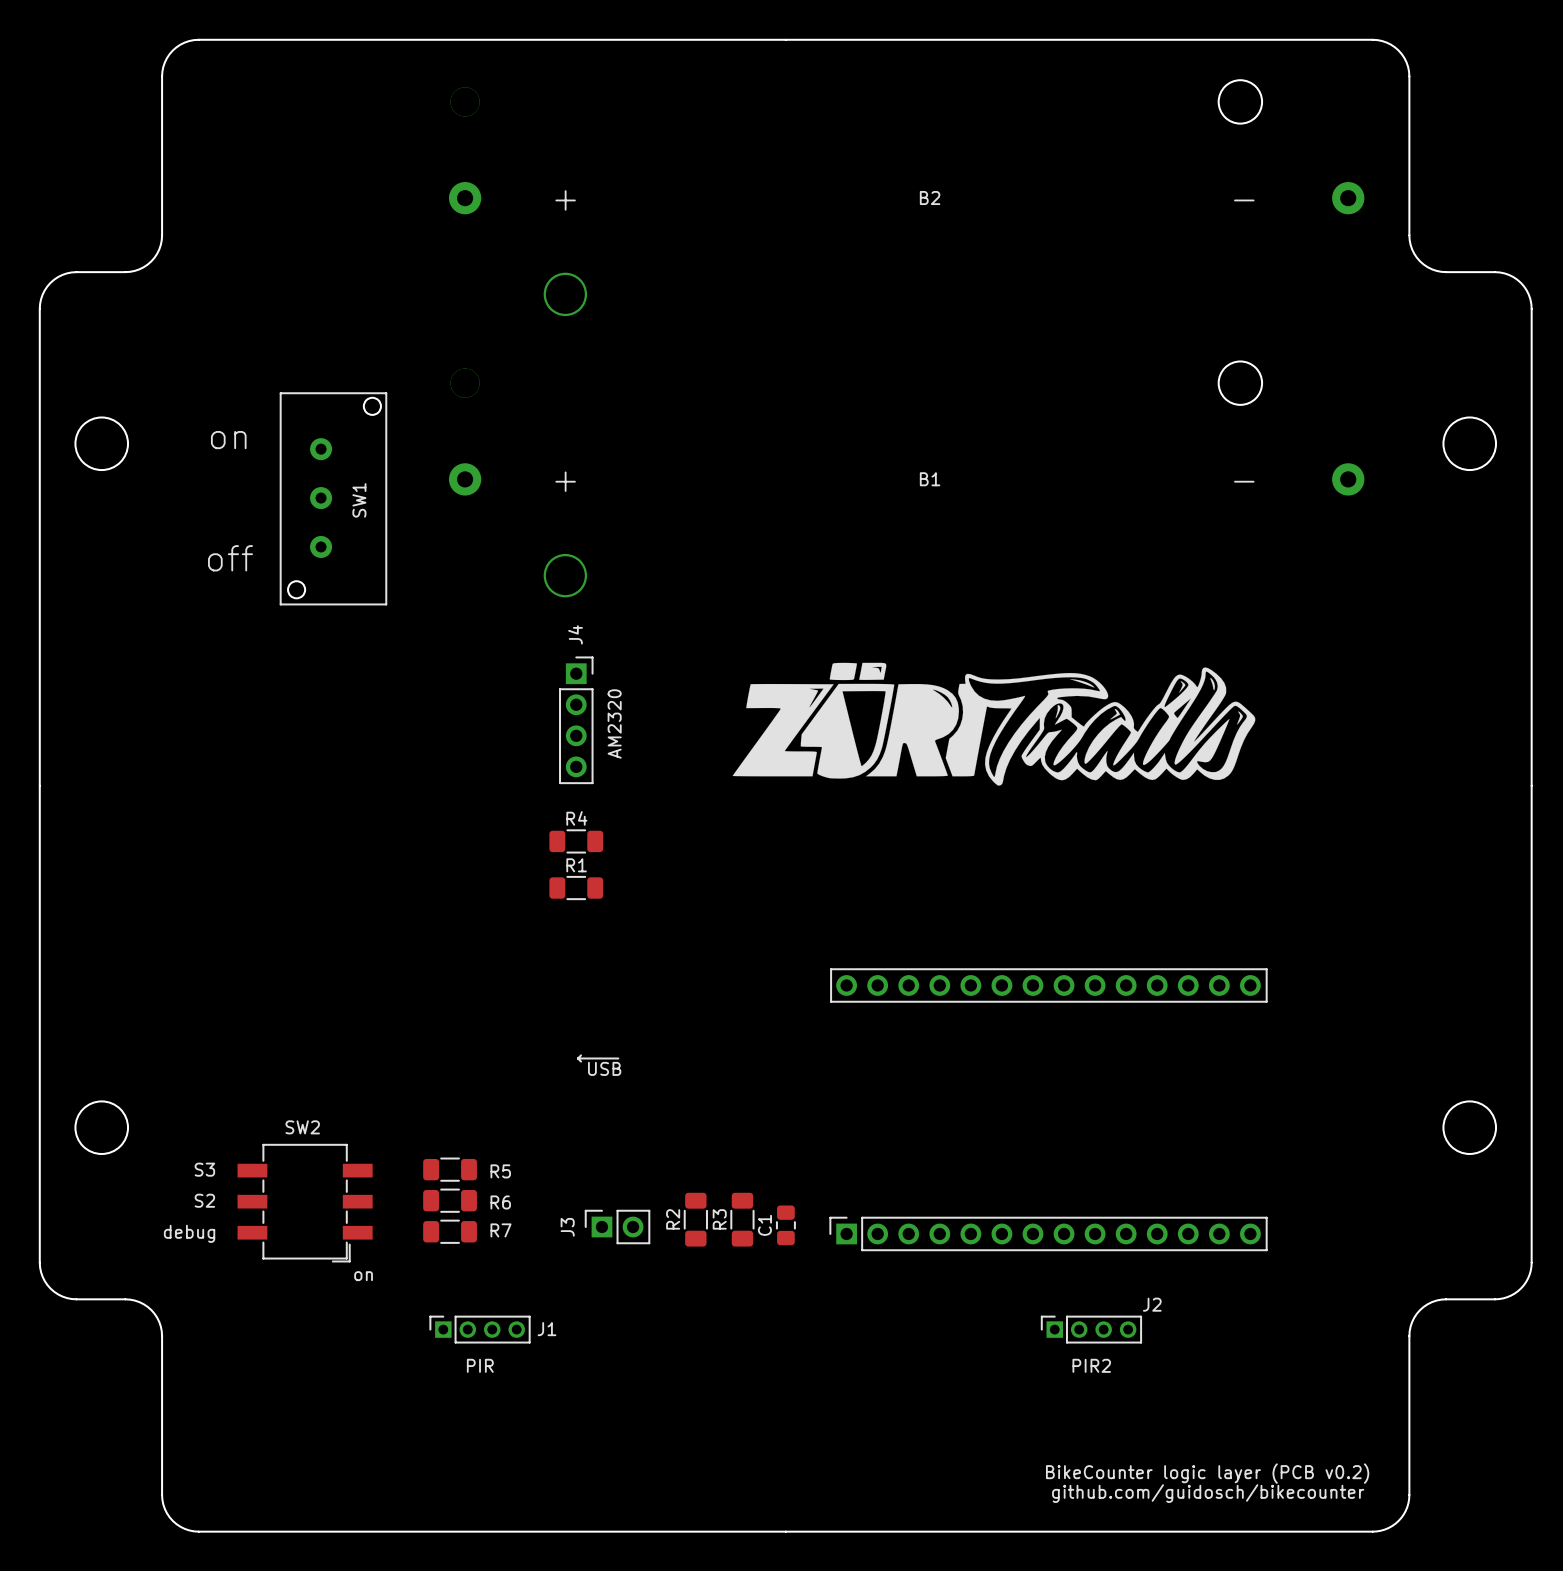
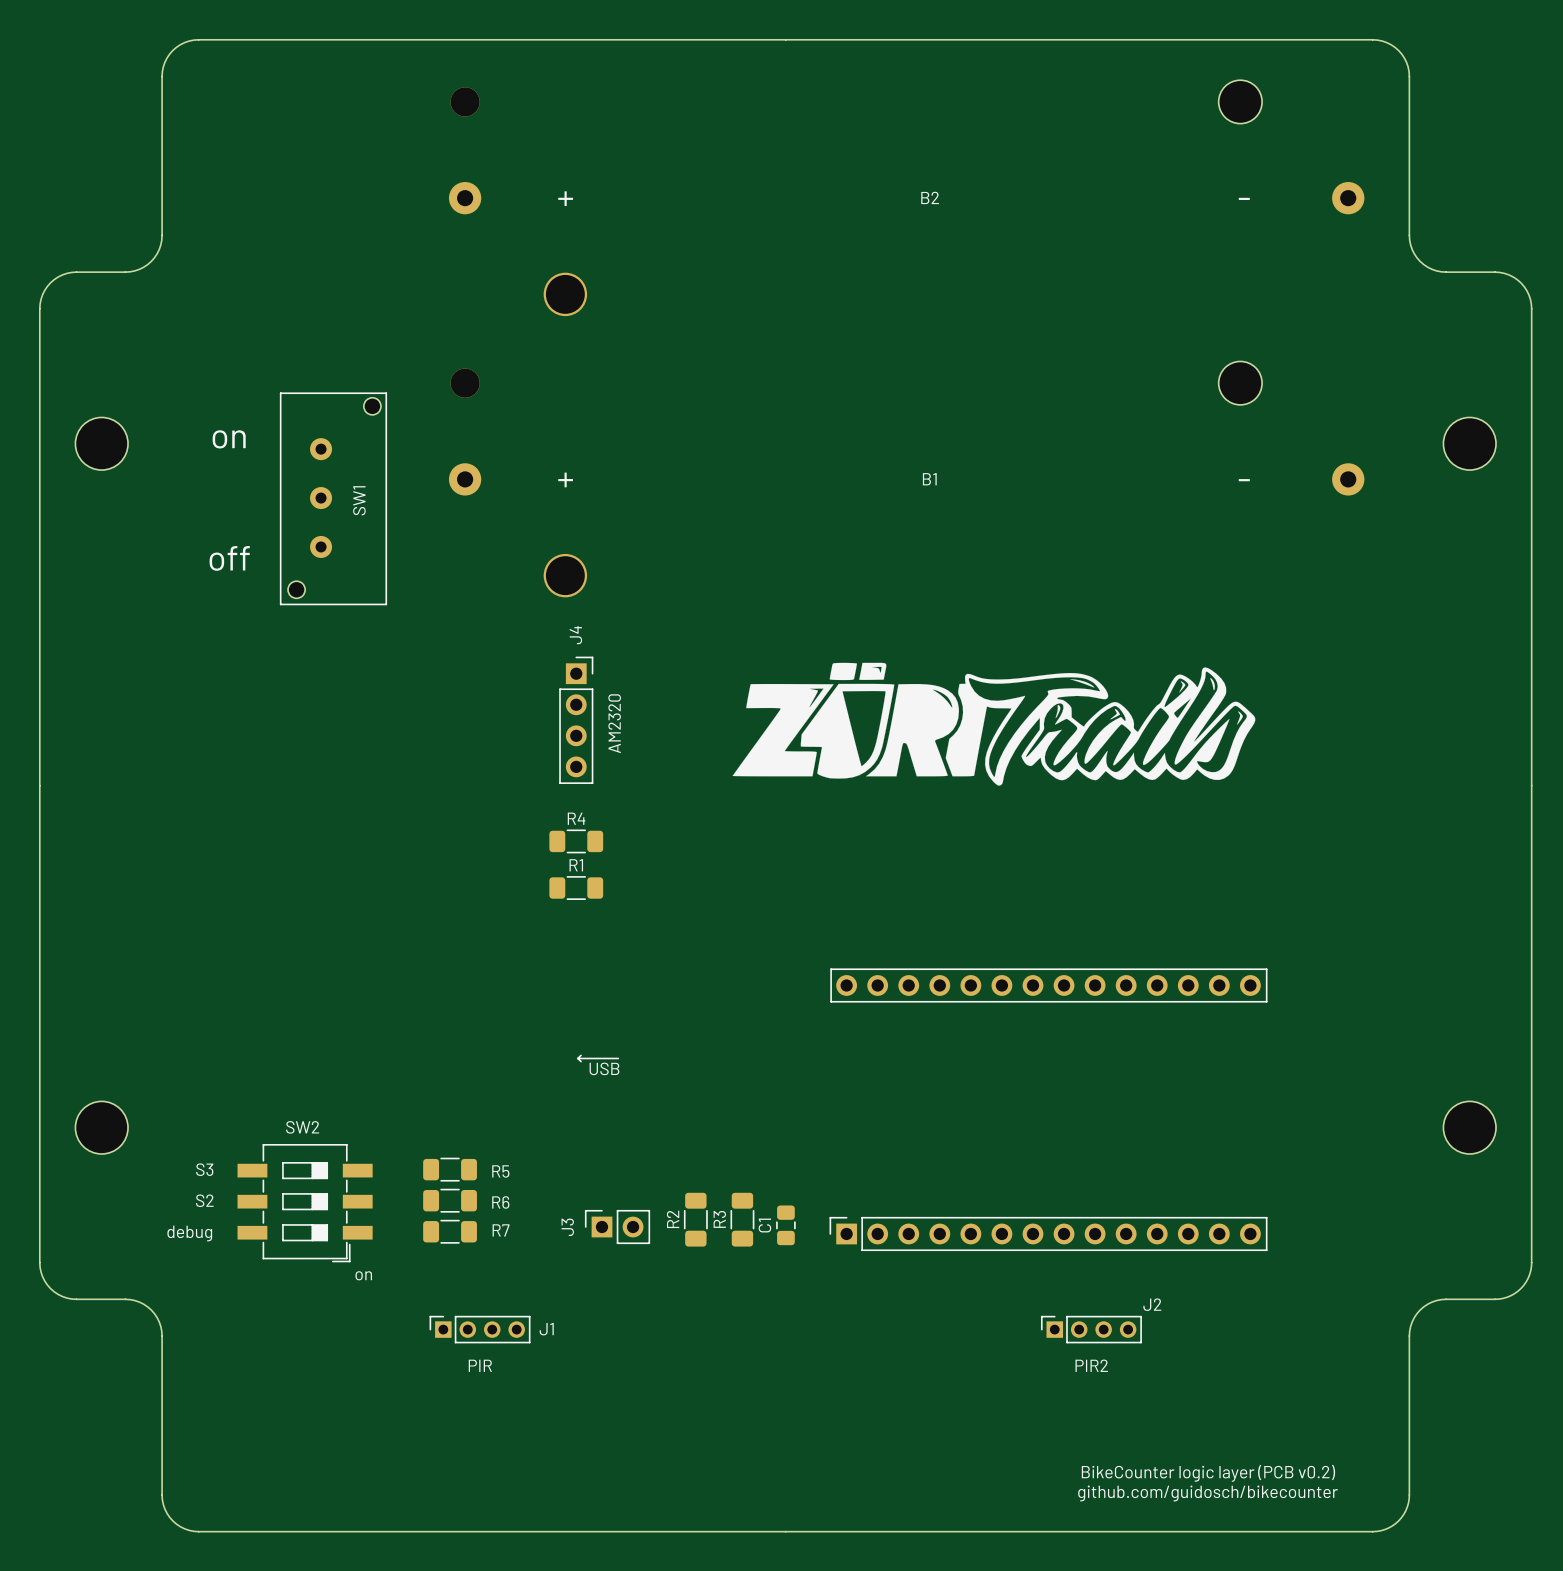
SW2 footprint: [237, 1144, 373, 1263] -> [237, 1144, 373, 1263]

